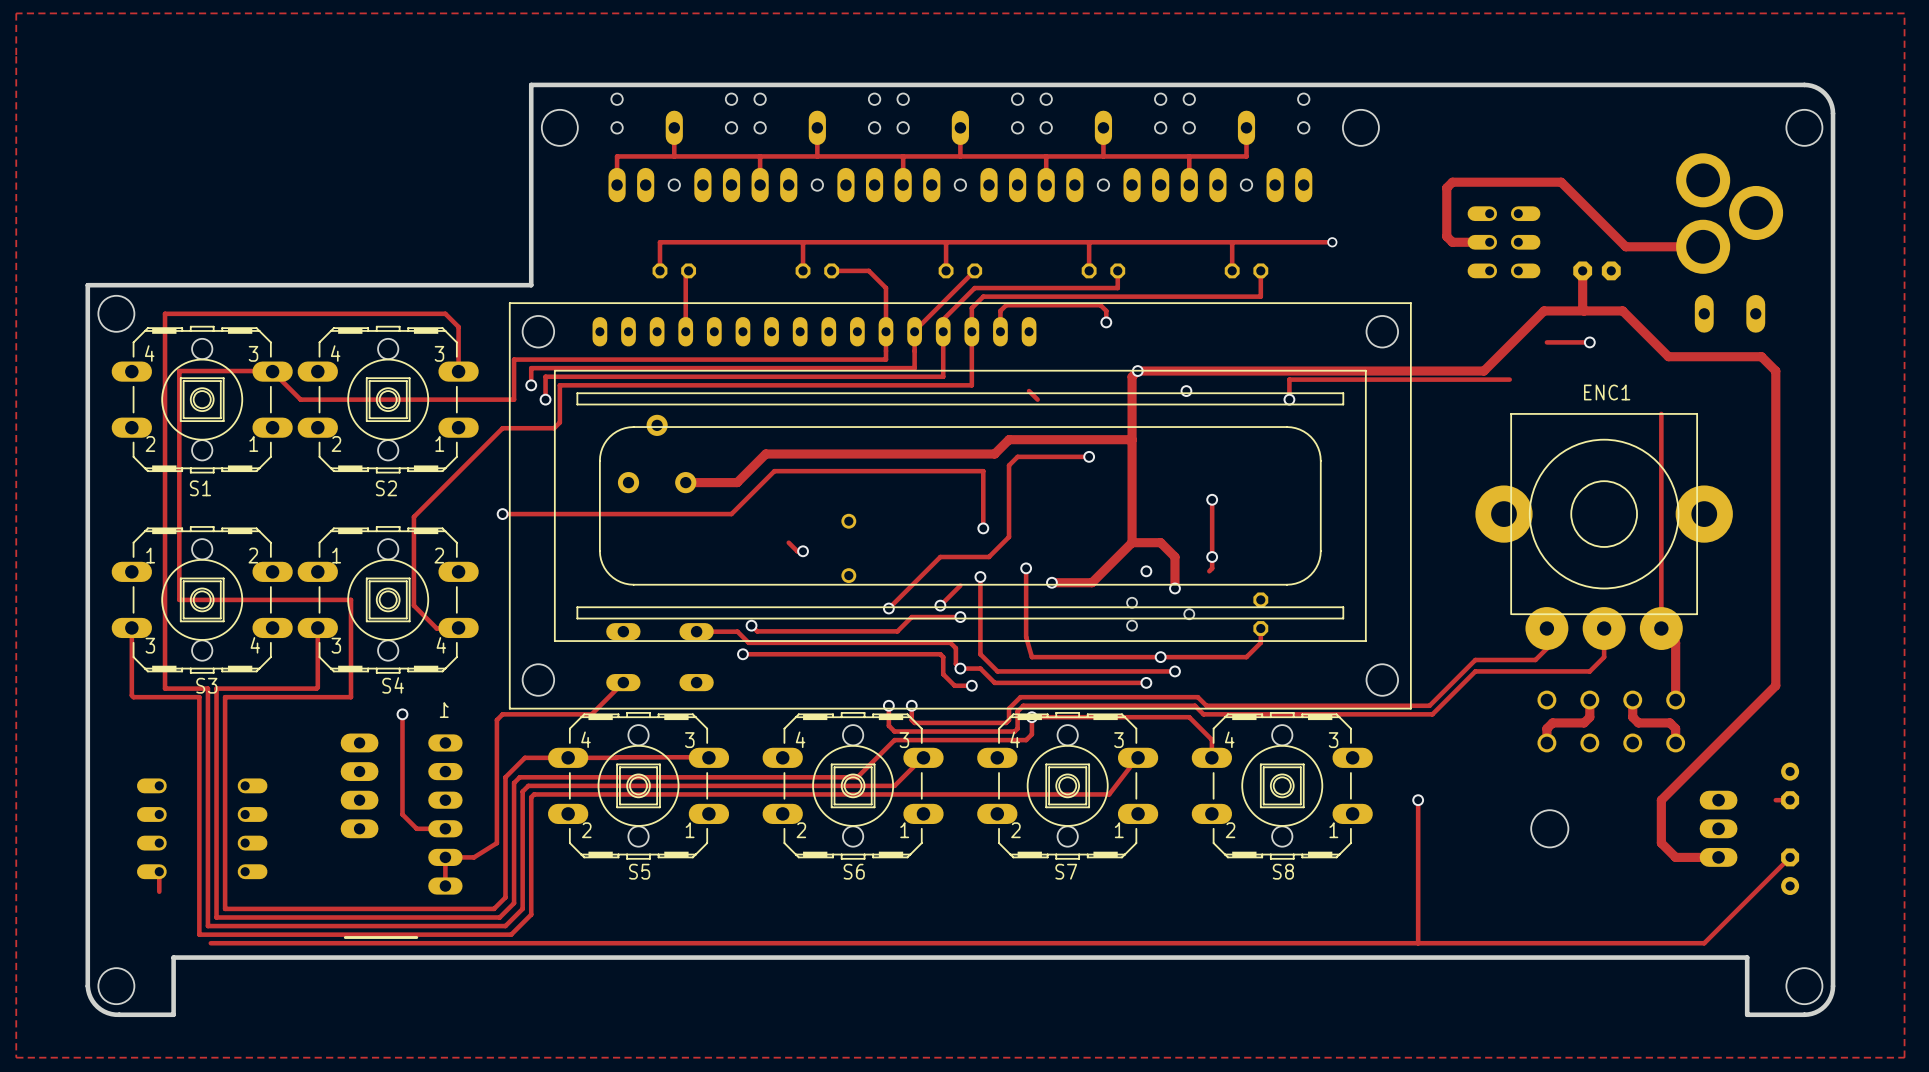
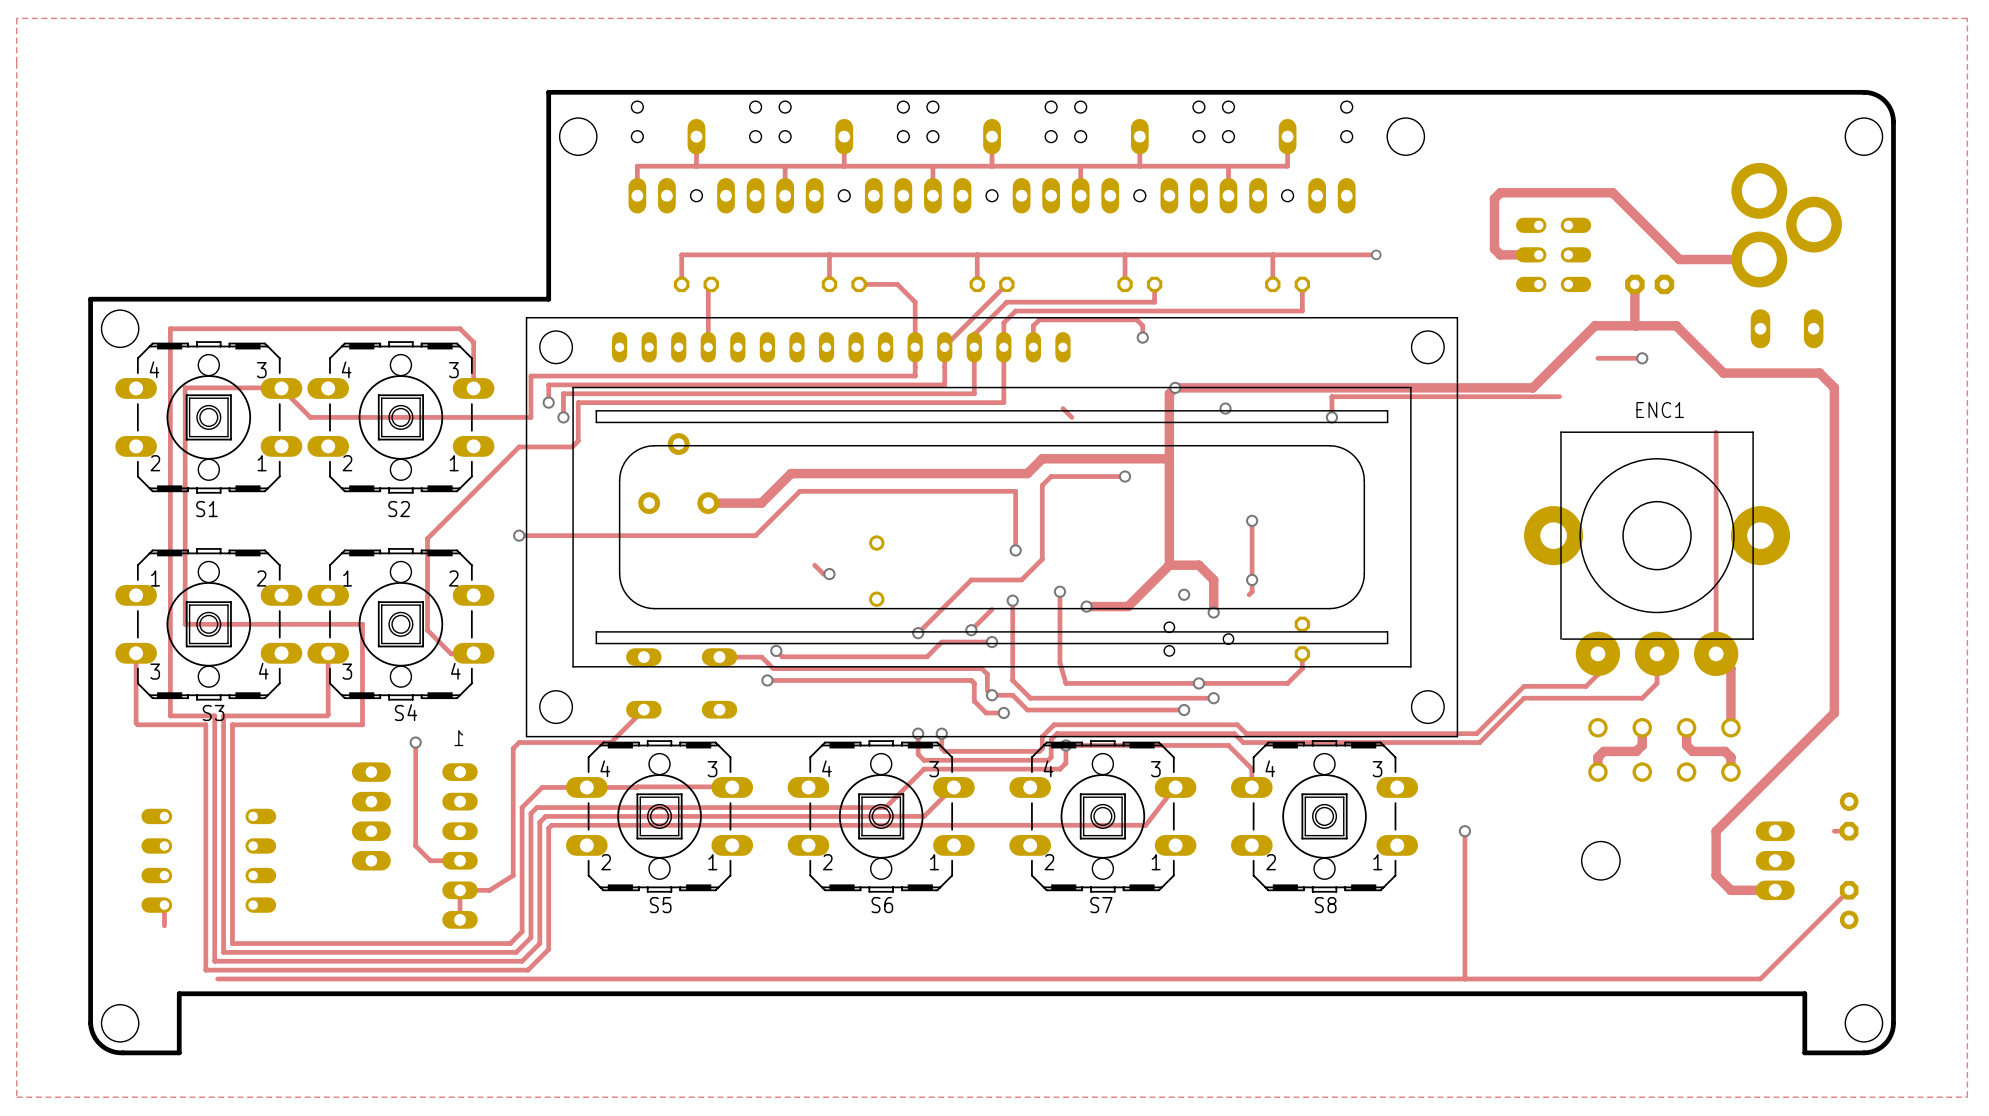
line: (345, 937) (416, 937) -> none

